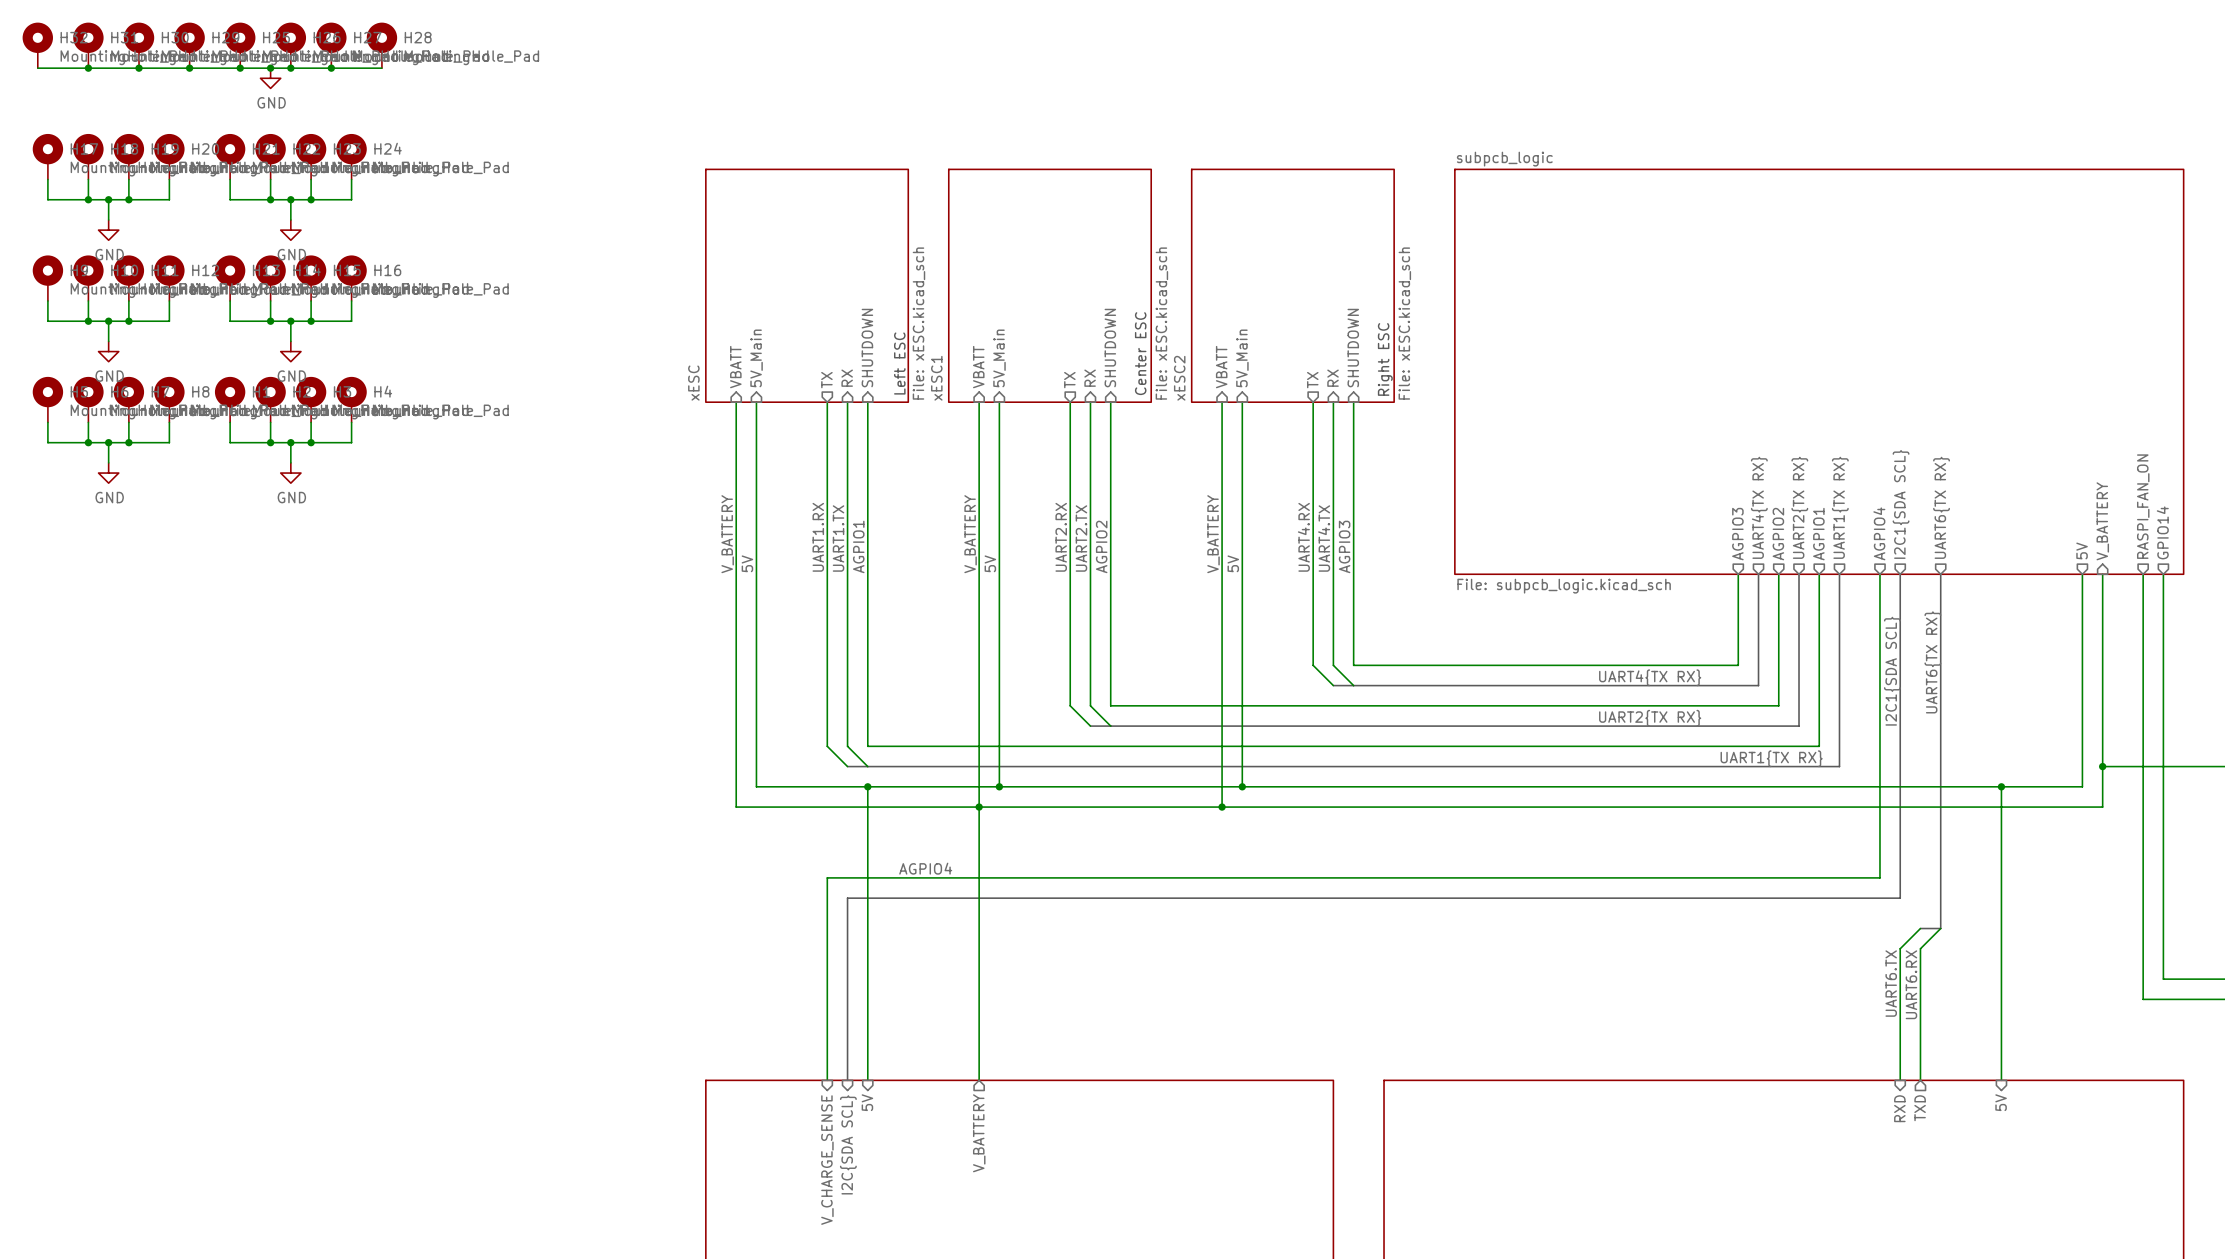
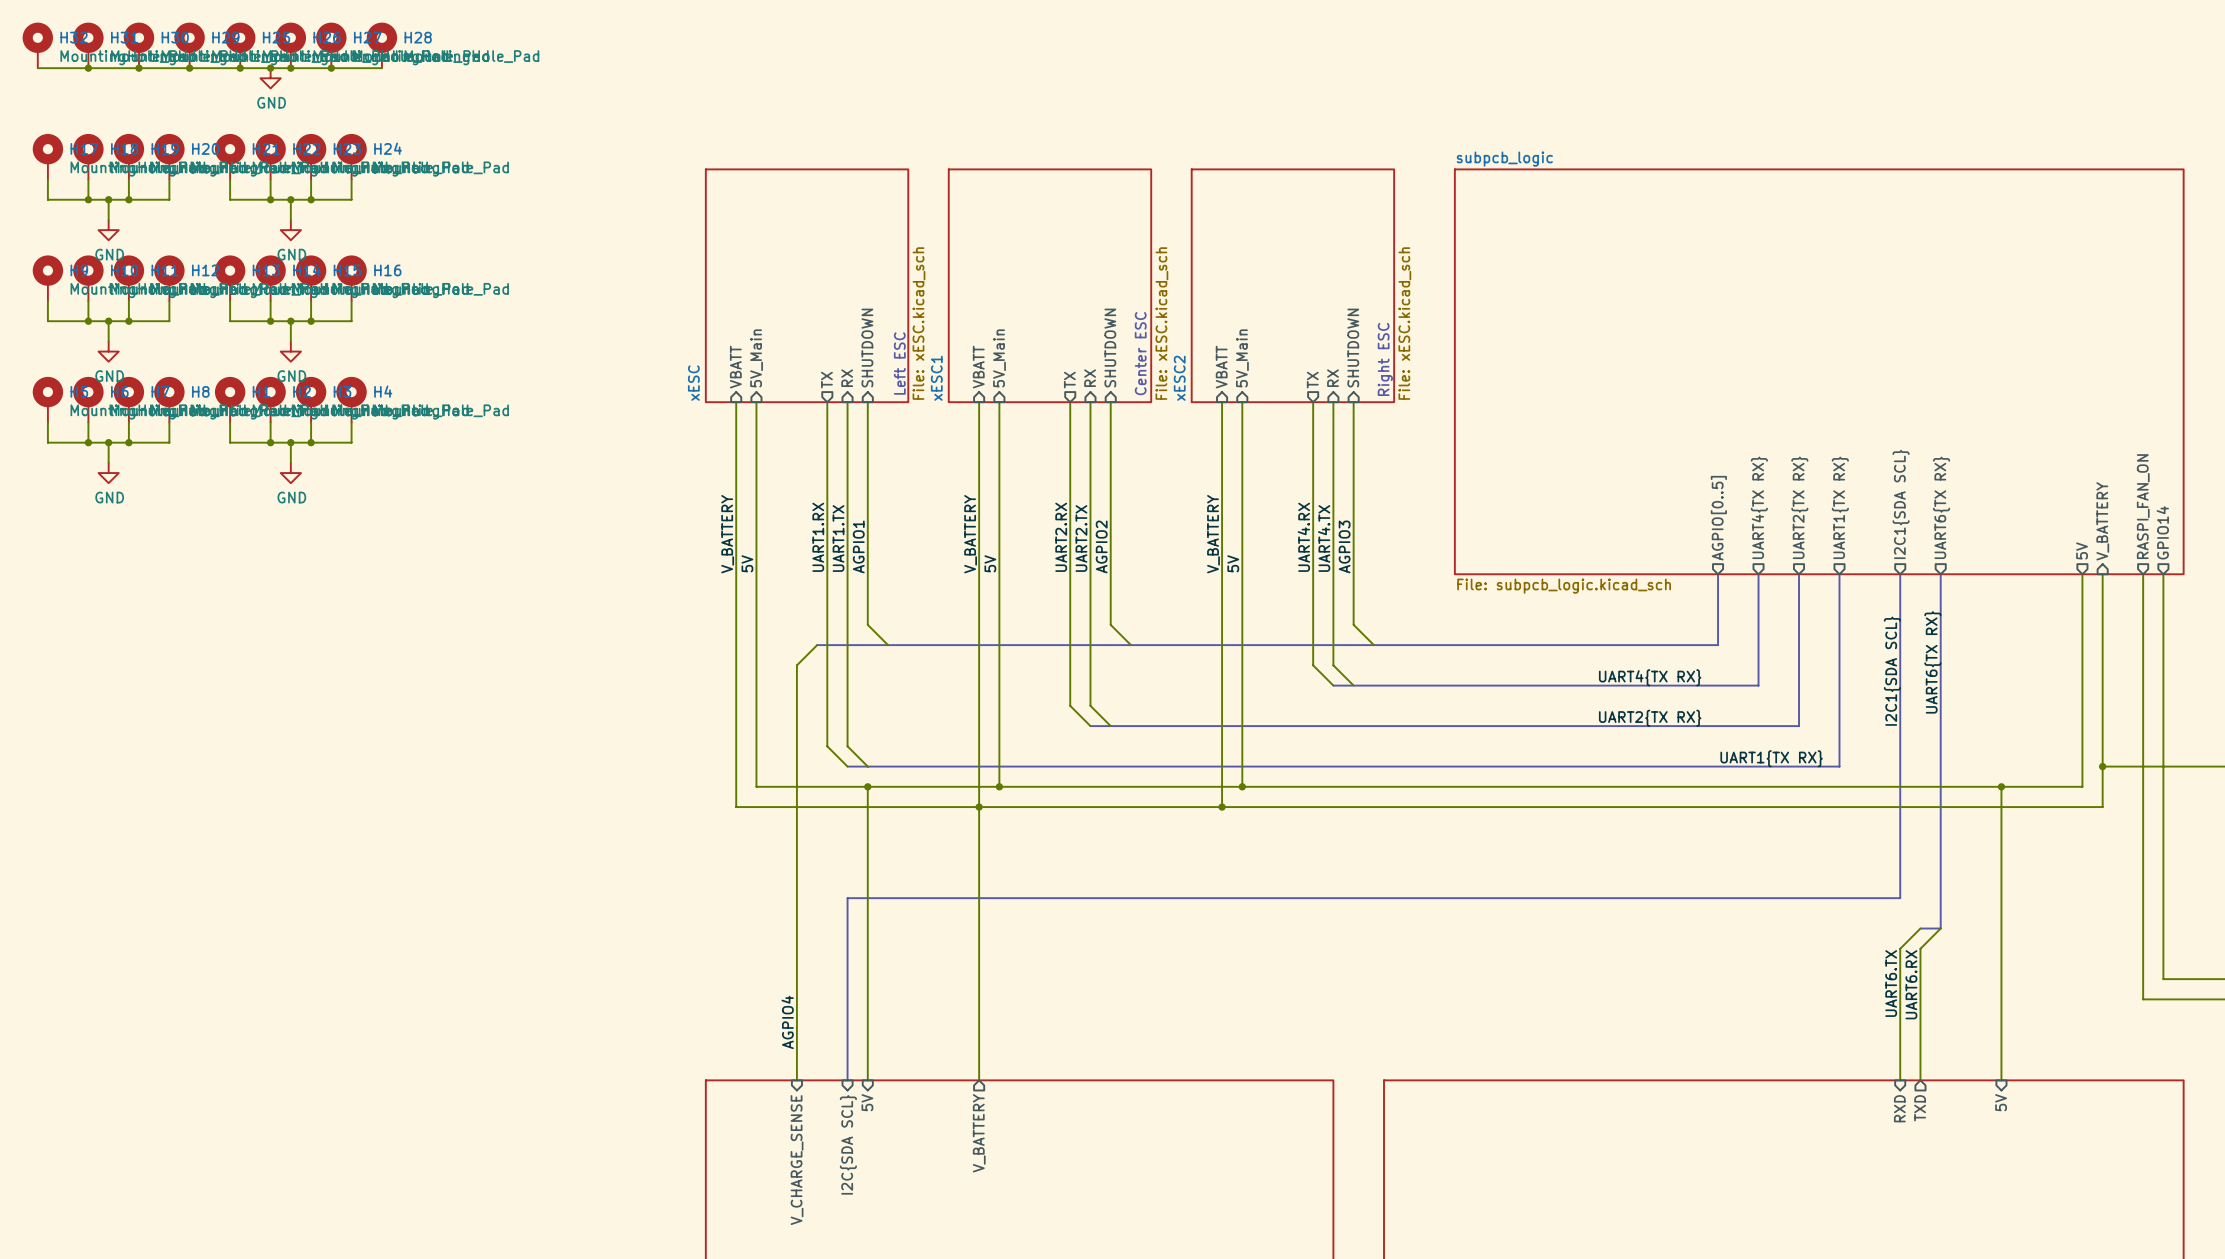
sheet pin: none -> AGPIO[0..5] (1718, 518)
sheet pin: AGPIO4 (1879, 533) -> none
sheet pin: AGPIO3 (1737, 534) -> none
sheet pin: AGPIO2 (1778, 534) -> none
sheet pin: AGPIO1 (1818, 534) -> none
bus: none -> (1718, 574) (1718, 645) (817, 645)
wire: (1738, 574) (1738, 665) (1353, 665) (1353, 624) -> (1373, 645) (1353, 624)
wire: (1778, 574) (1778, 705) (1110, 705) (1110, 624) -> (1130, 645) (1110, 624)
wire: (1819, 574) (1819, 746) (867, 746) (867, 624) -> (888, 645) (867, 624)
wire: (1879, 574) (1879, 877) (827, 877) (827, 1080) -> none
wire: none -> (817, 645) (796, 665) (796, 1080)
label: AGPIO4 (925, 868) -> none
label: none -> AGPIO4 (787, 1022)
sheet pin position: V_CHARGE_SENSE (827, 1160) -> V_CHARGE_SENSE (797, 1160)

